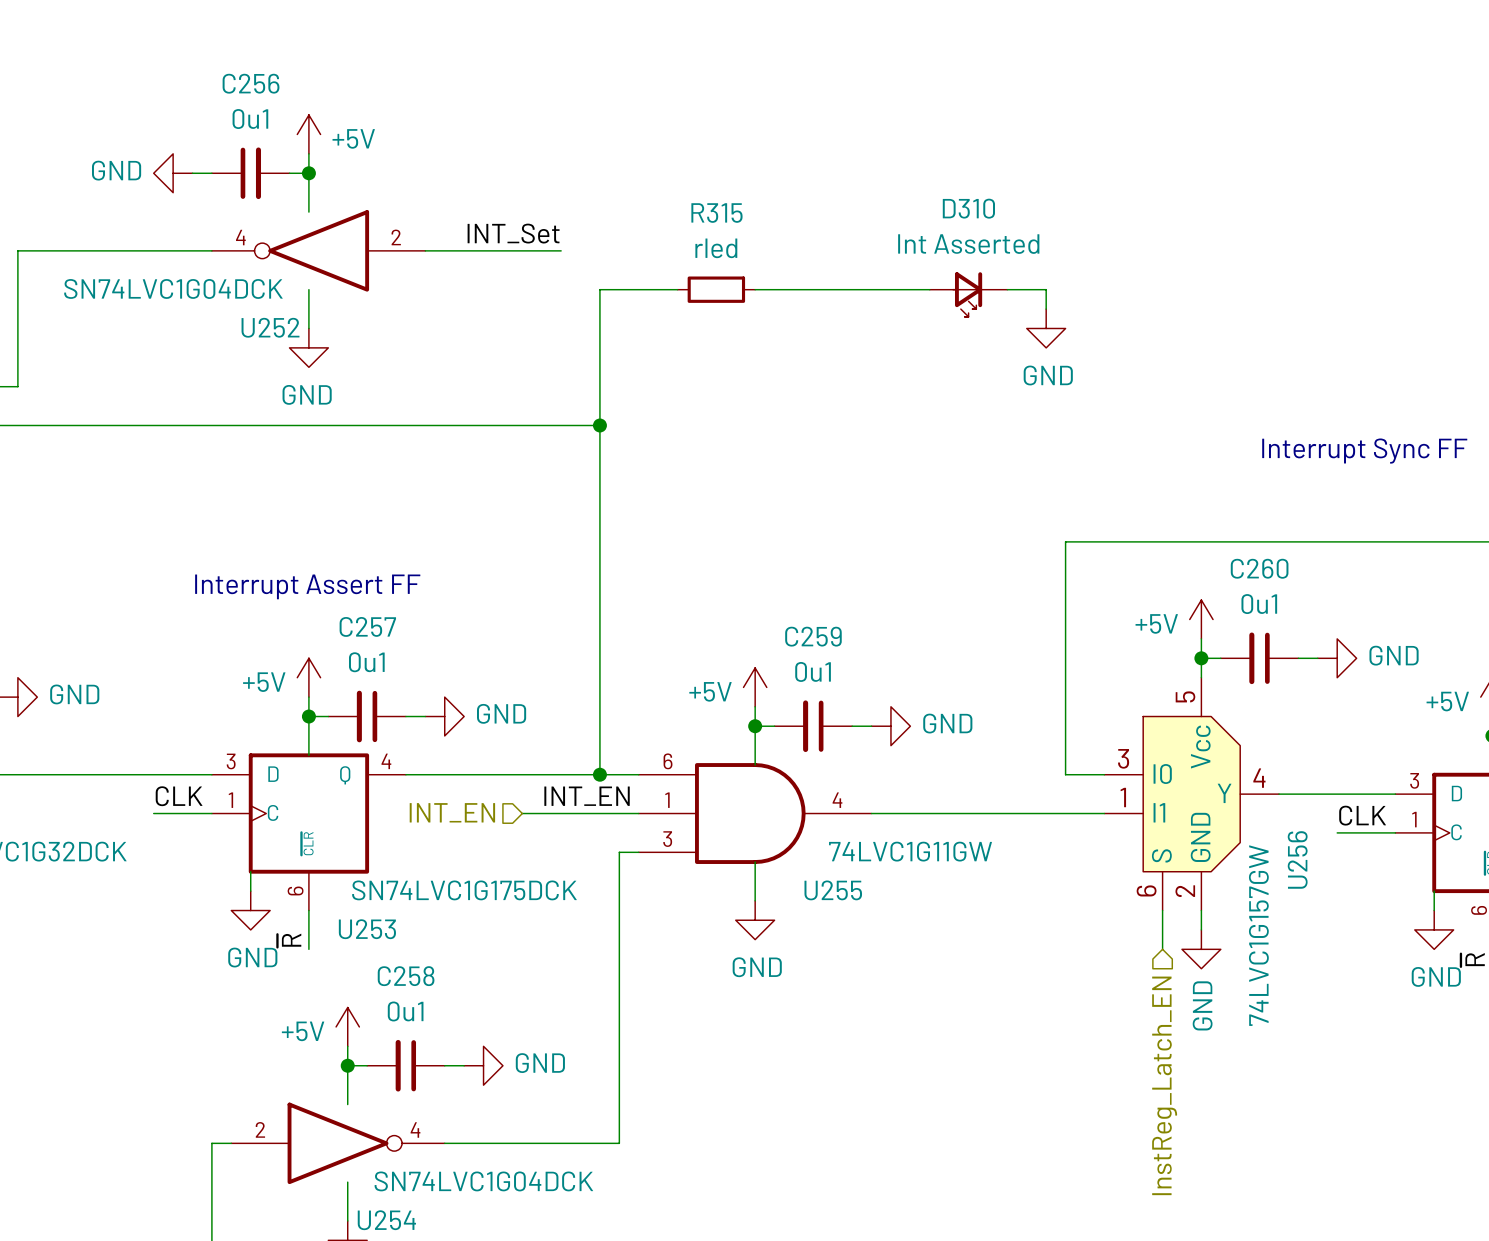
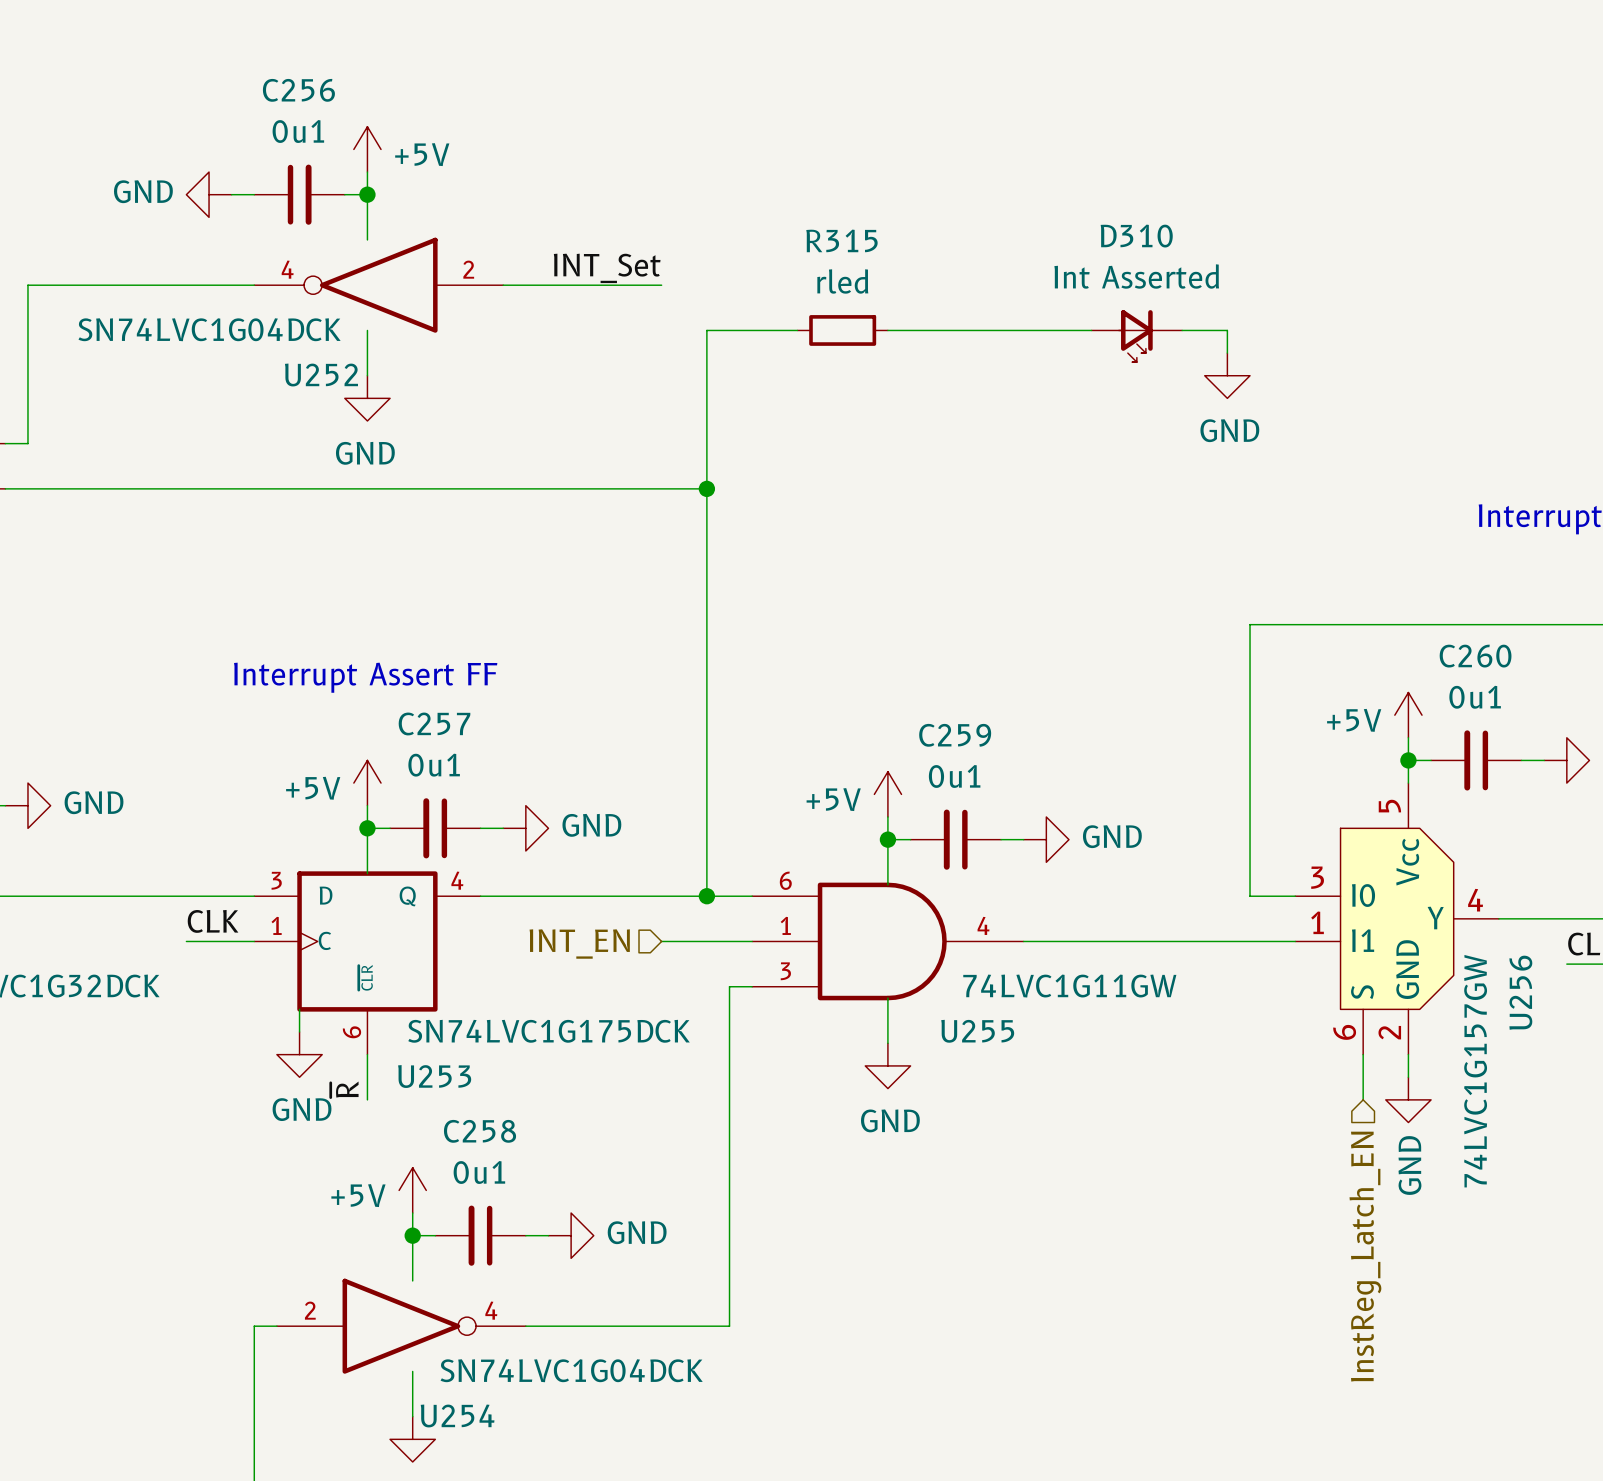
label: INT_EN (587, 796) -> none
hierarchical label position: INT_EN (452, 812) -> INT_EN (579, 944)
wire: (522, 813) (561, 813) -> none

